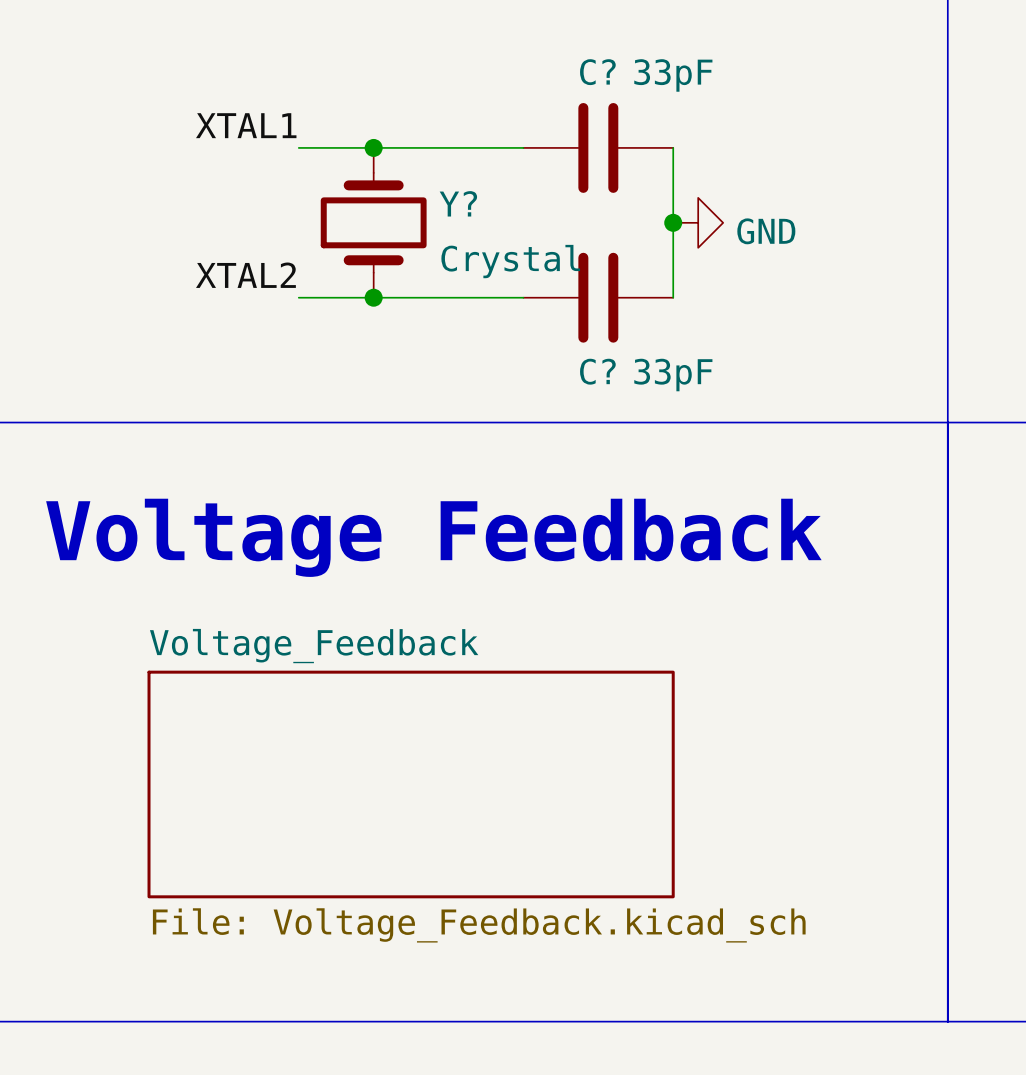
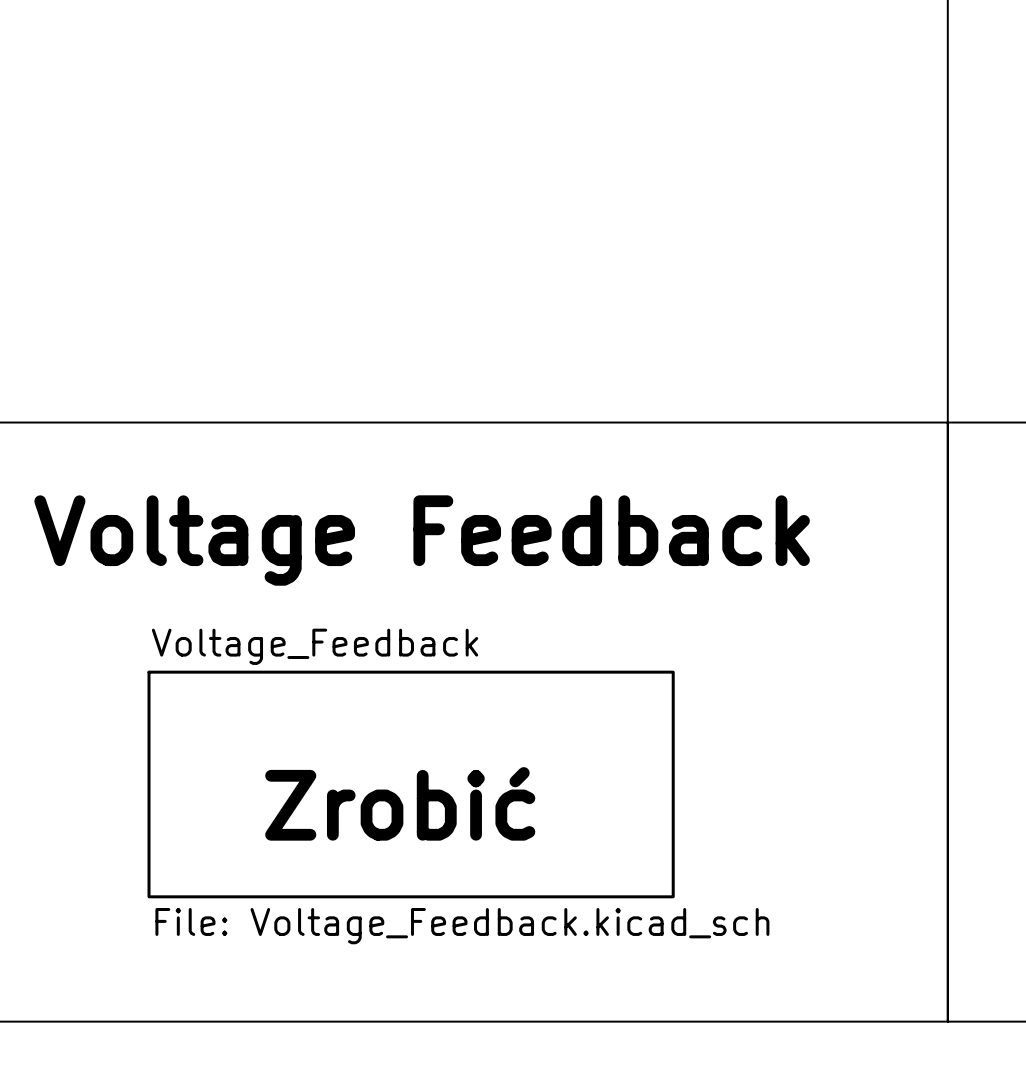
label: XTAL1 (246, 125) -> none
wire: (298, 147) (523, 147) -> none
junction: (373, 147) -> none
C?: 33pF (598, 147) -> none
wire: (673, 147) (673, 297) -> none
Y?: Crystal (373, 222) -> none
junction: (673, 222) -> none
power symbol: GND (698, 222) -> none
label: XTAL2 (245, 275) -> none
wire: (298, 297) (523, 297) -> none
junction: (373, 297) -> none
C?: 33pF (598, 297) -> none
text: none -> Zrobić (400, 803)

